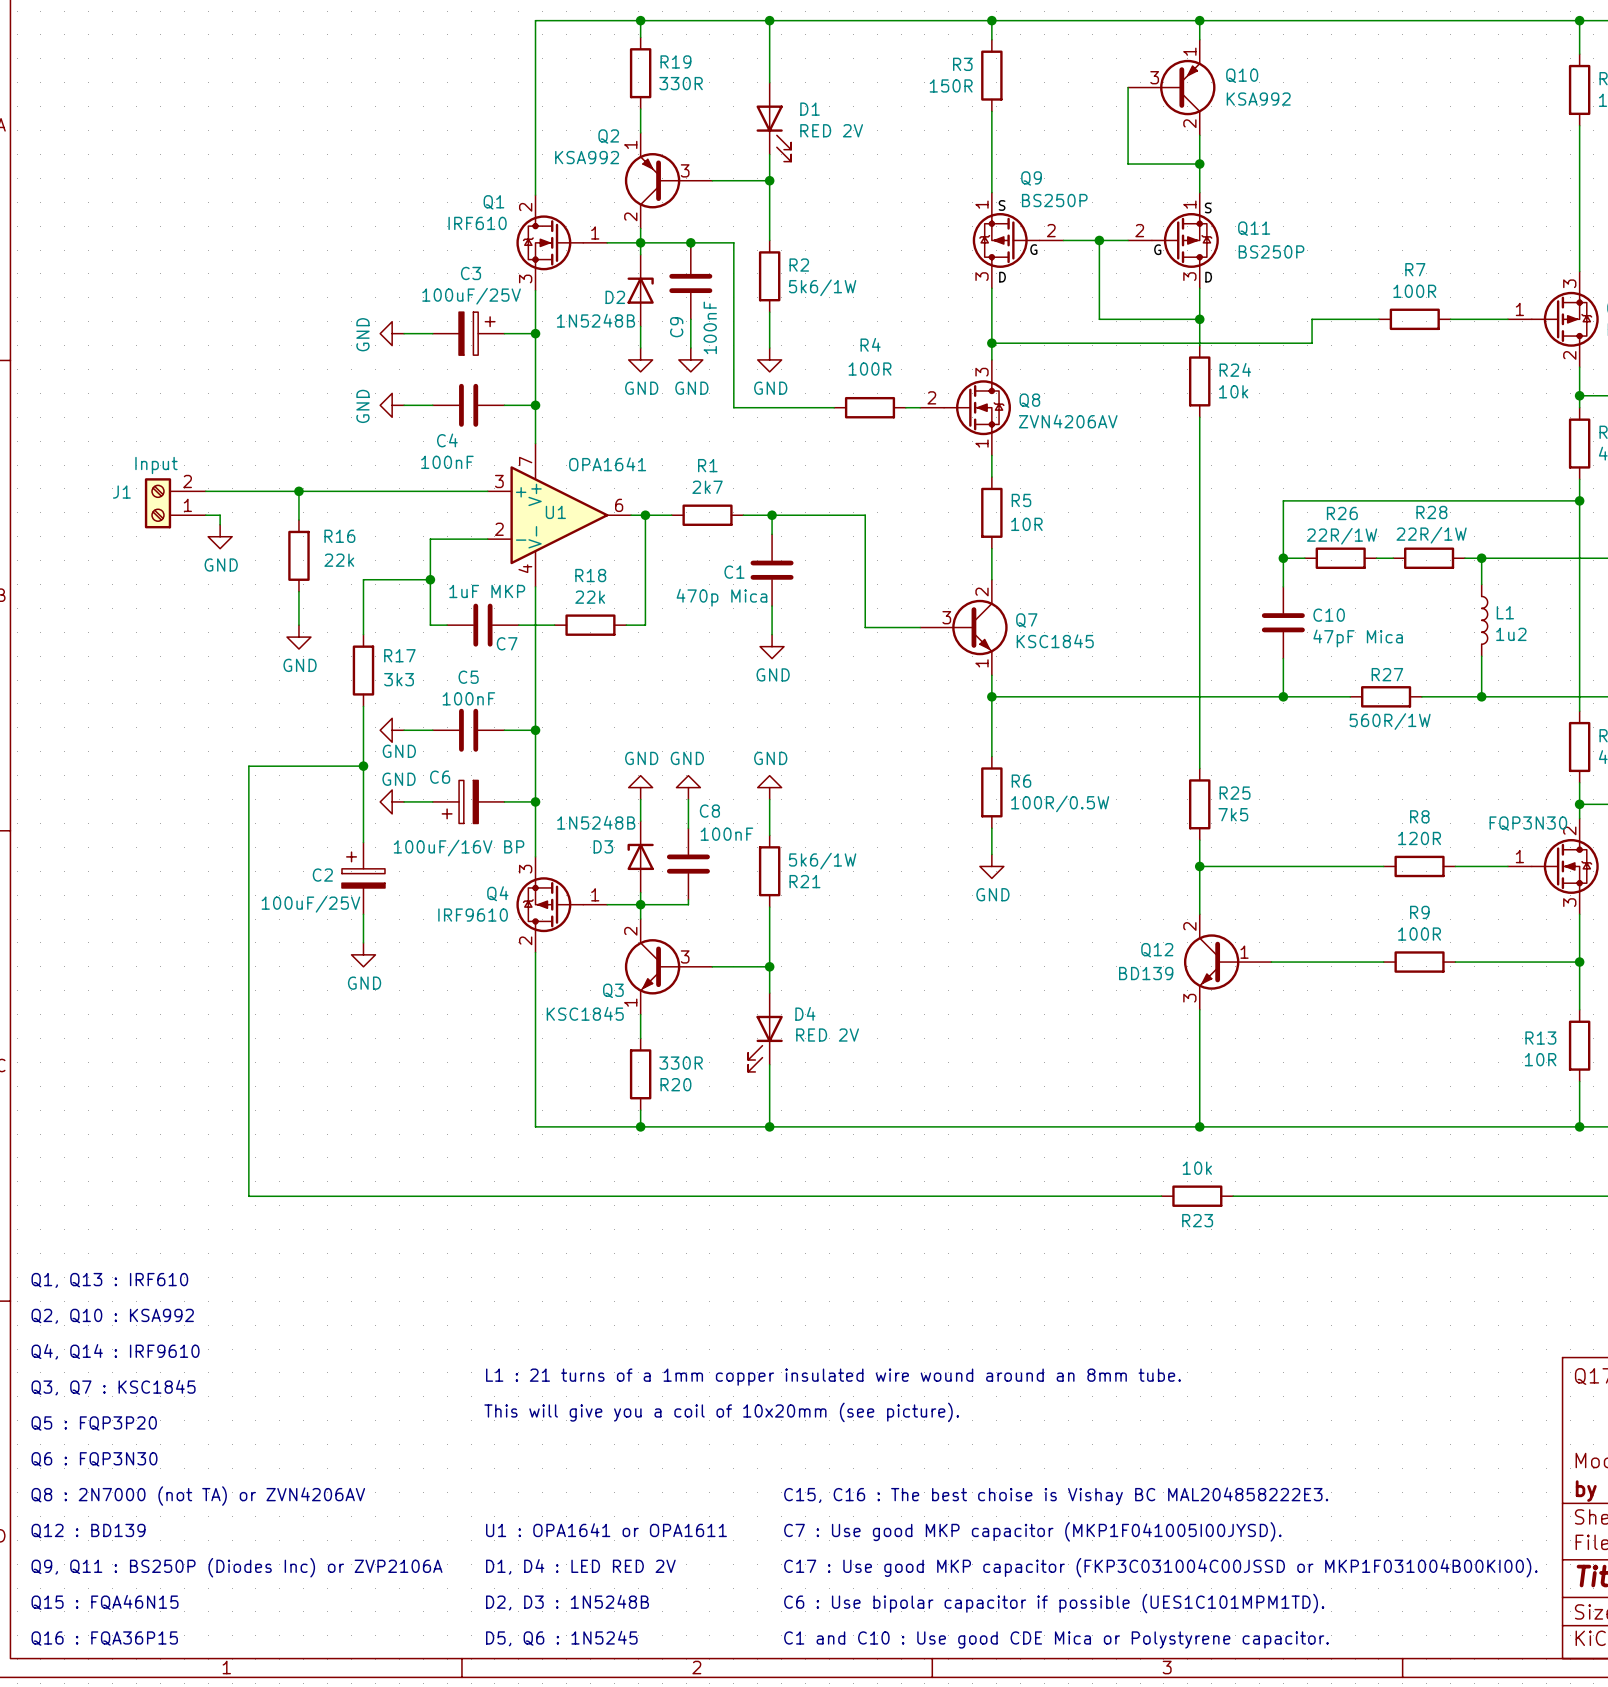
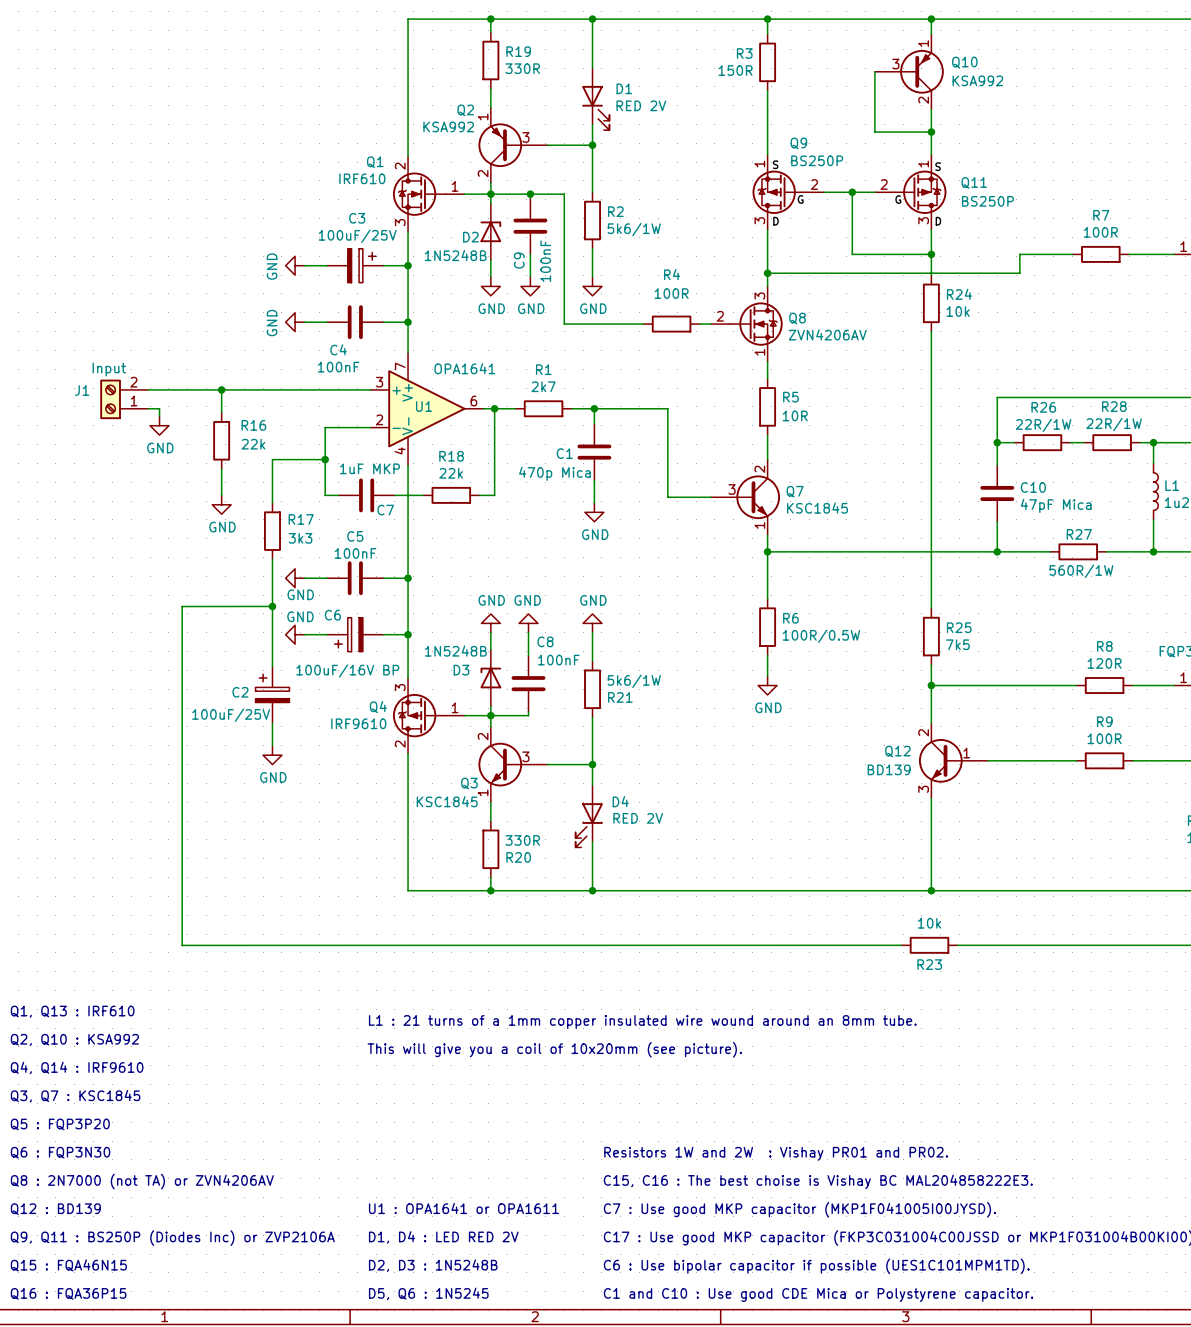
text position: L1 : 21 turns of a 1mm copper insulated wire wound around an 8mm tube. (833, 1377) -> L1 : 21 turns of a 1mm copper insulated wire wound around an 8mm tube. (642, 1022)
text position: This will give you a coil of 10x20mm (see picture). (721, 1412) -> This will give you a coil of 10x20mm (see picture). (554, 1049)
text: none -> Resistors 1W and 2W : Vishay PR01 and PR02. (776, 1153)

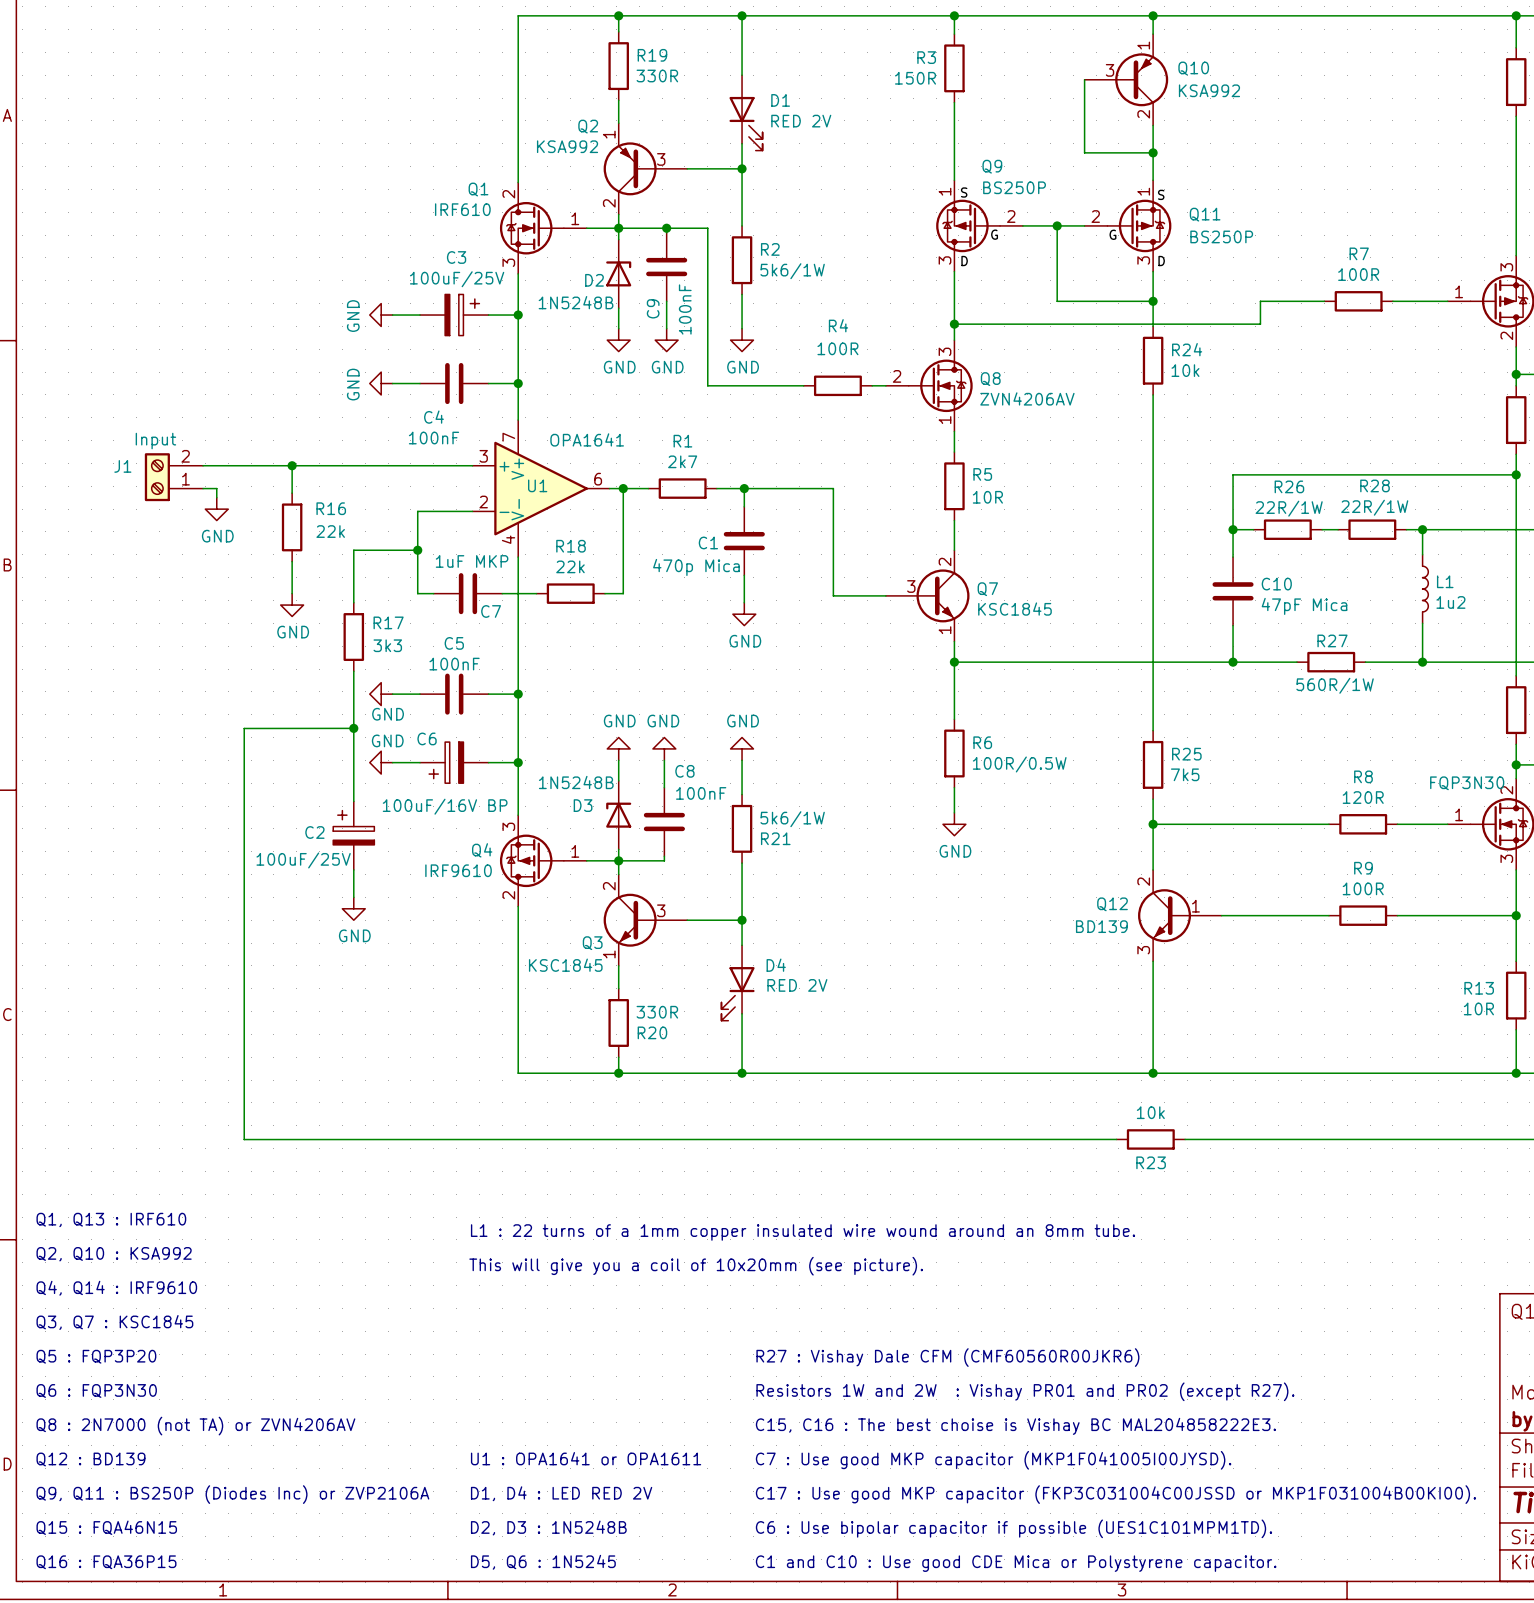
text: L1 : 21 turns of a 1mm copper insulated wire wound around an 8mm tube. (642, 1022) -> L1 : 22 turns of a 1mm copper insulated wire wound around an 8mm tube. (803, 1232)
text: none -> R27 : Vishay Dale CFM (CMF60560R00JKR6) (947, 1357)
text: Resistors 1W and 2W : Vishay PR01 and PR02. (776, 1153) -> Resistors 1W and 2W : Vishay PR01 and PR02 (except R27). (1025, 1391)

